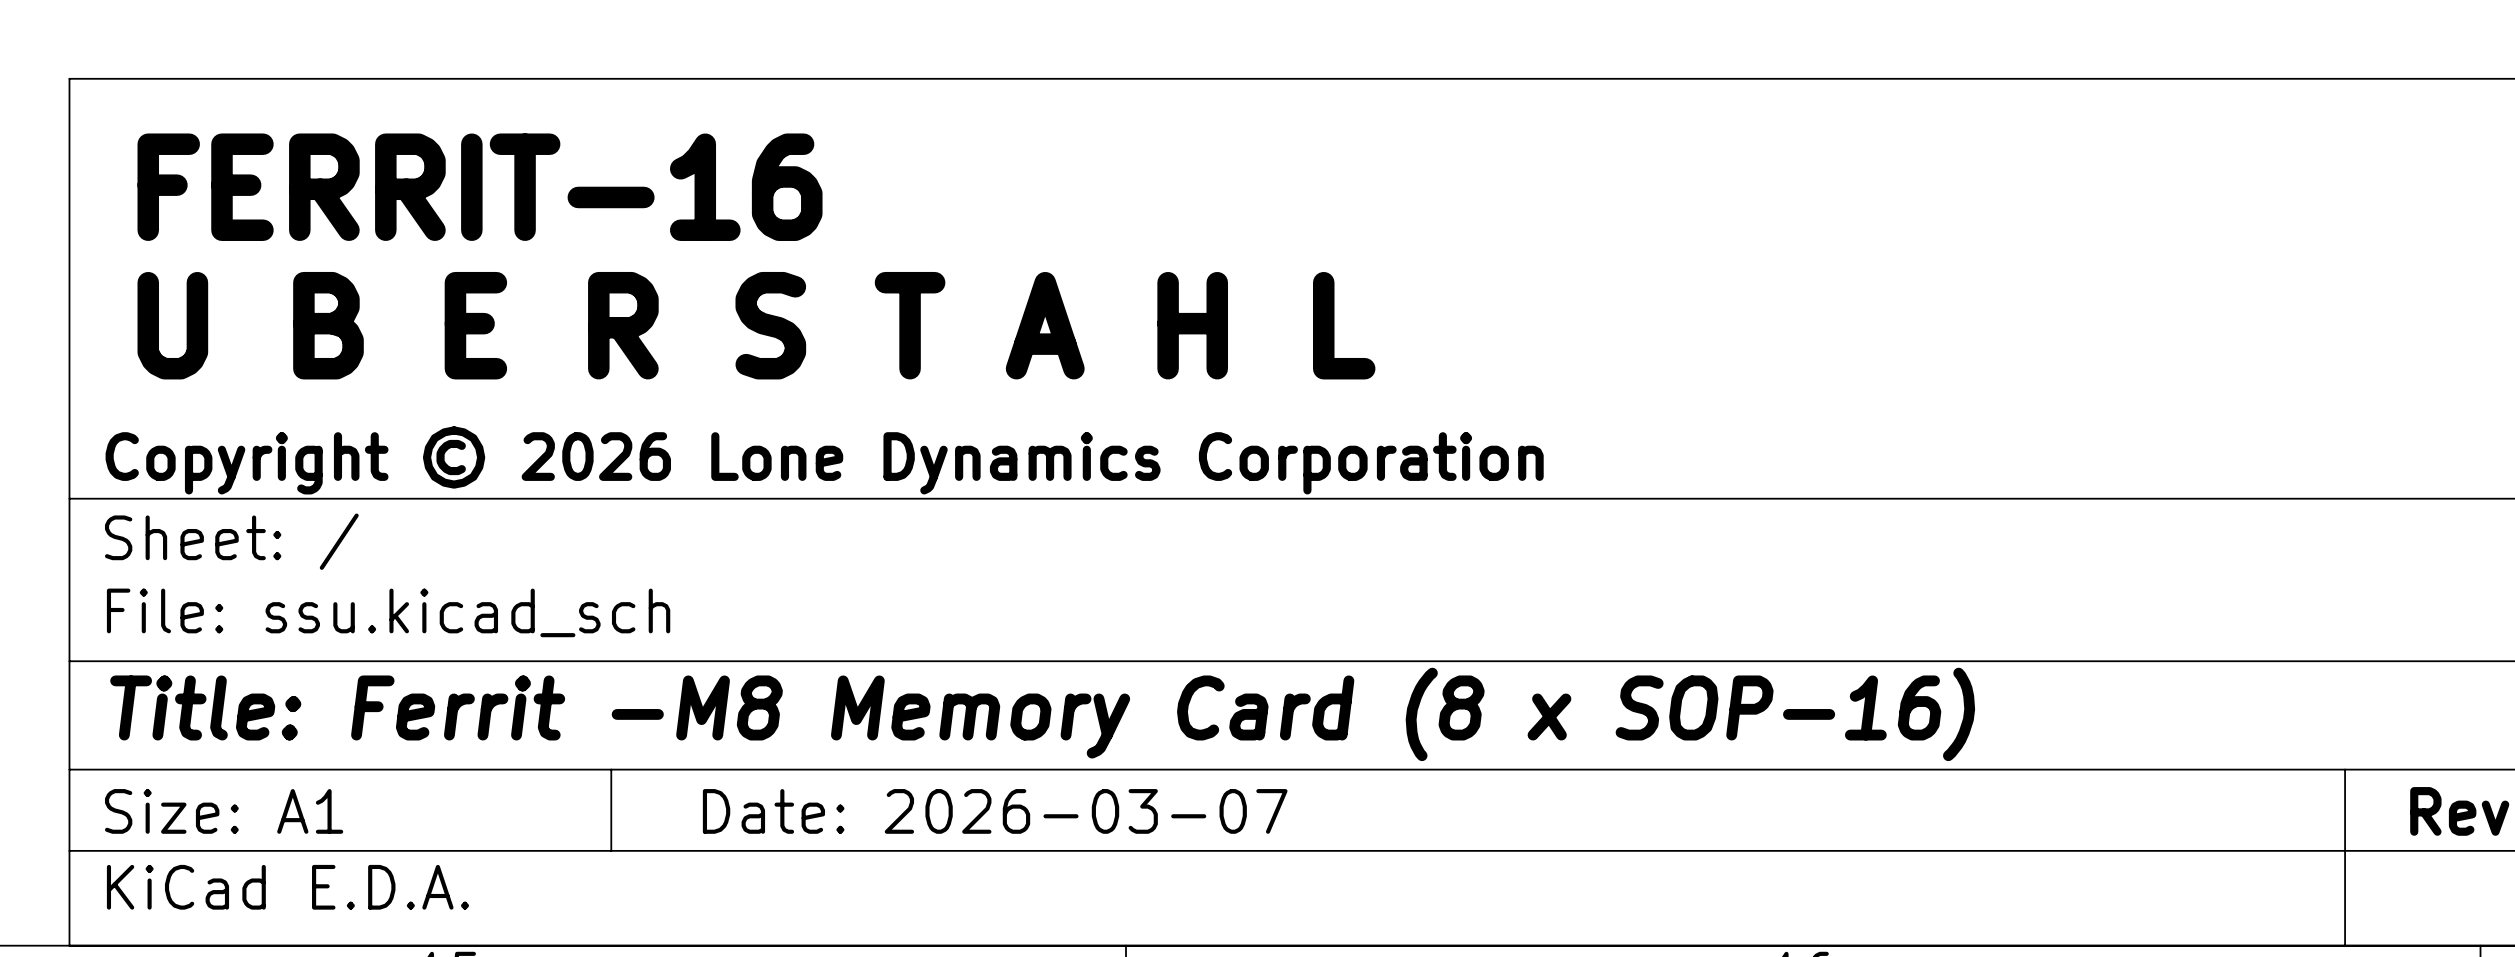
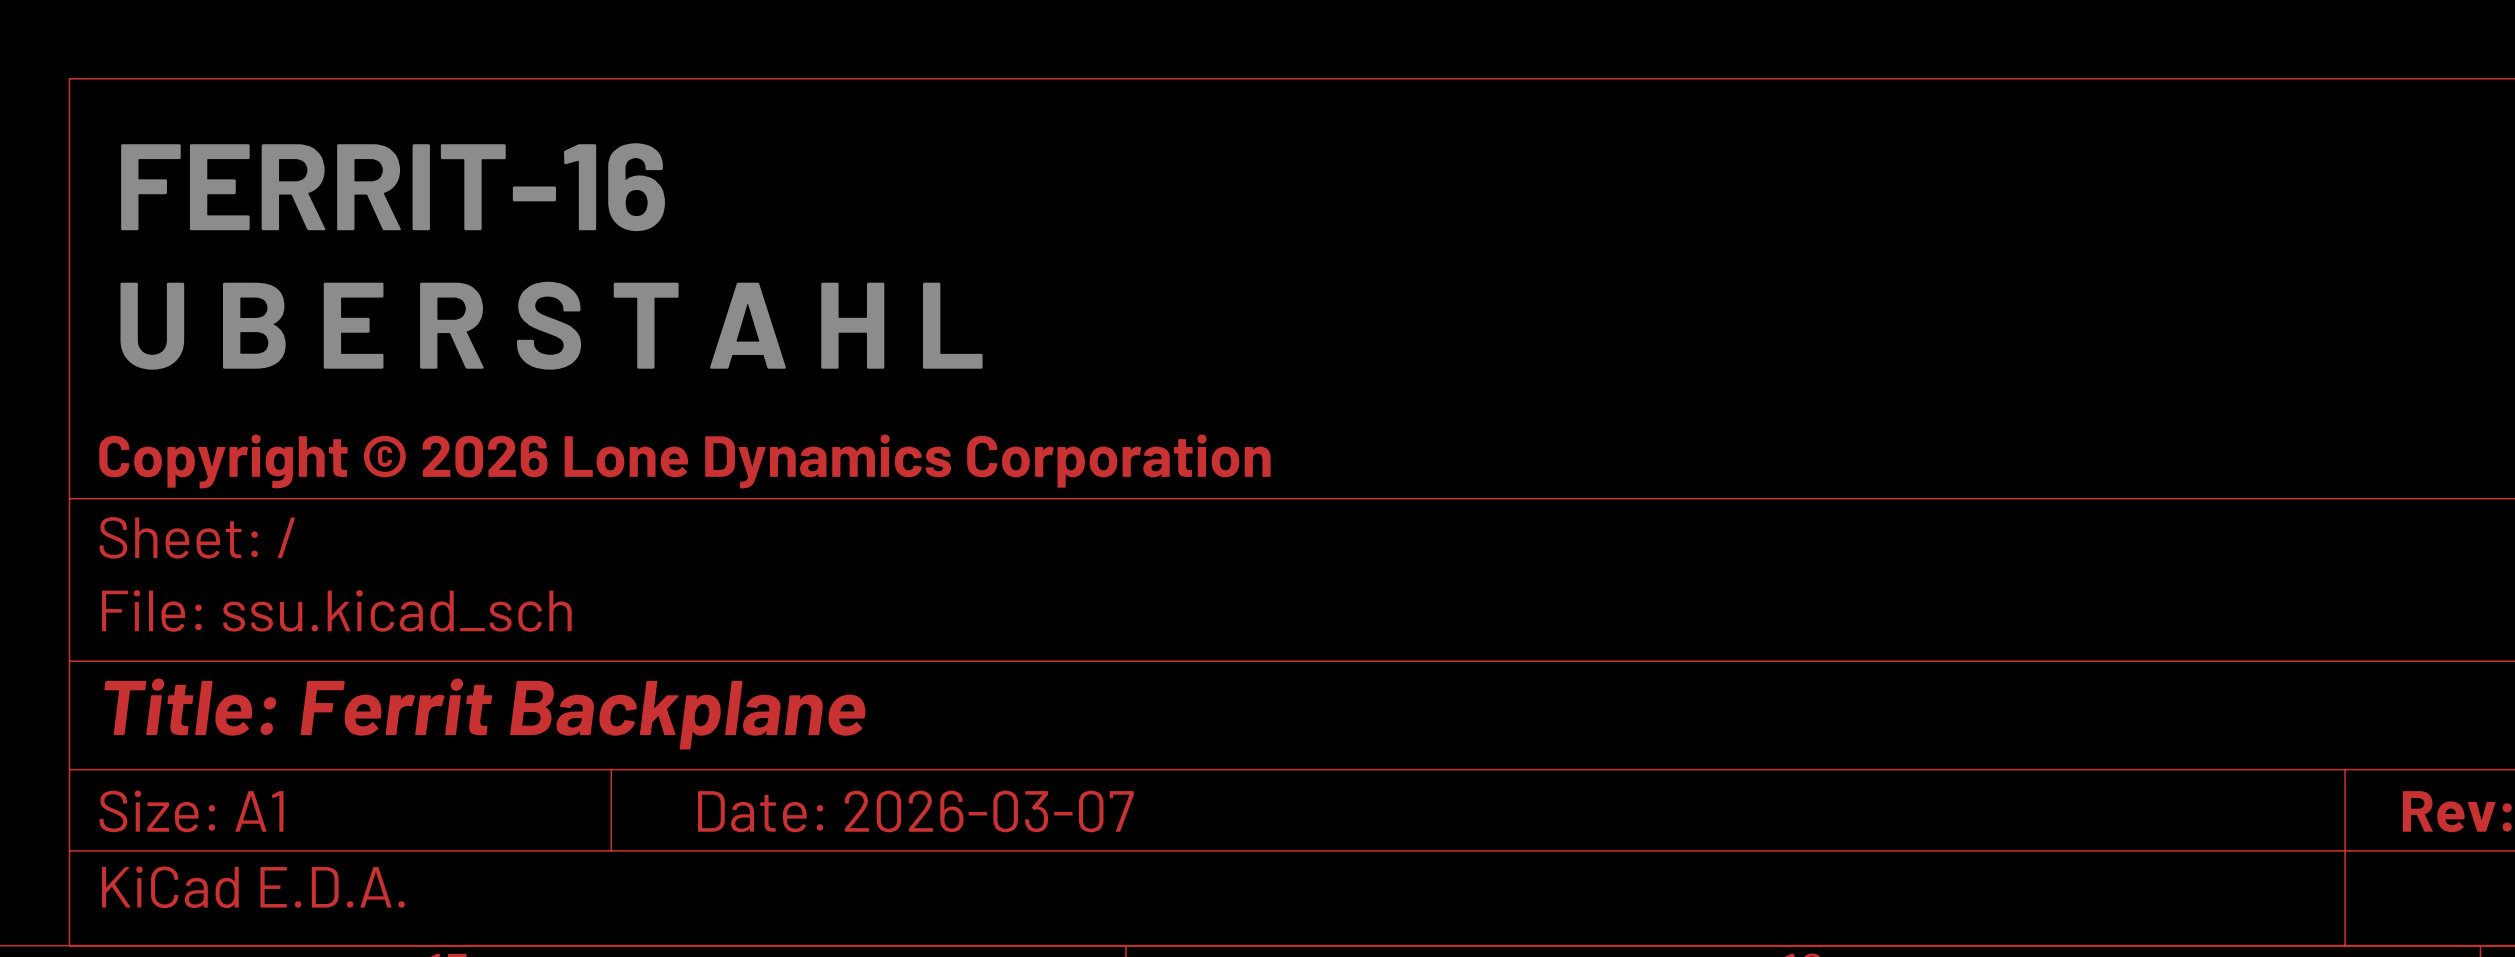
title block: Title: Ferrit -M8 Memory Card (8 x SOP-16) (1042, 714) -> Title: Ferrit Backplane (484, 714)

